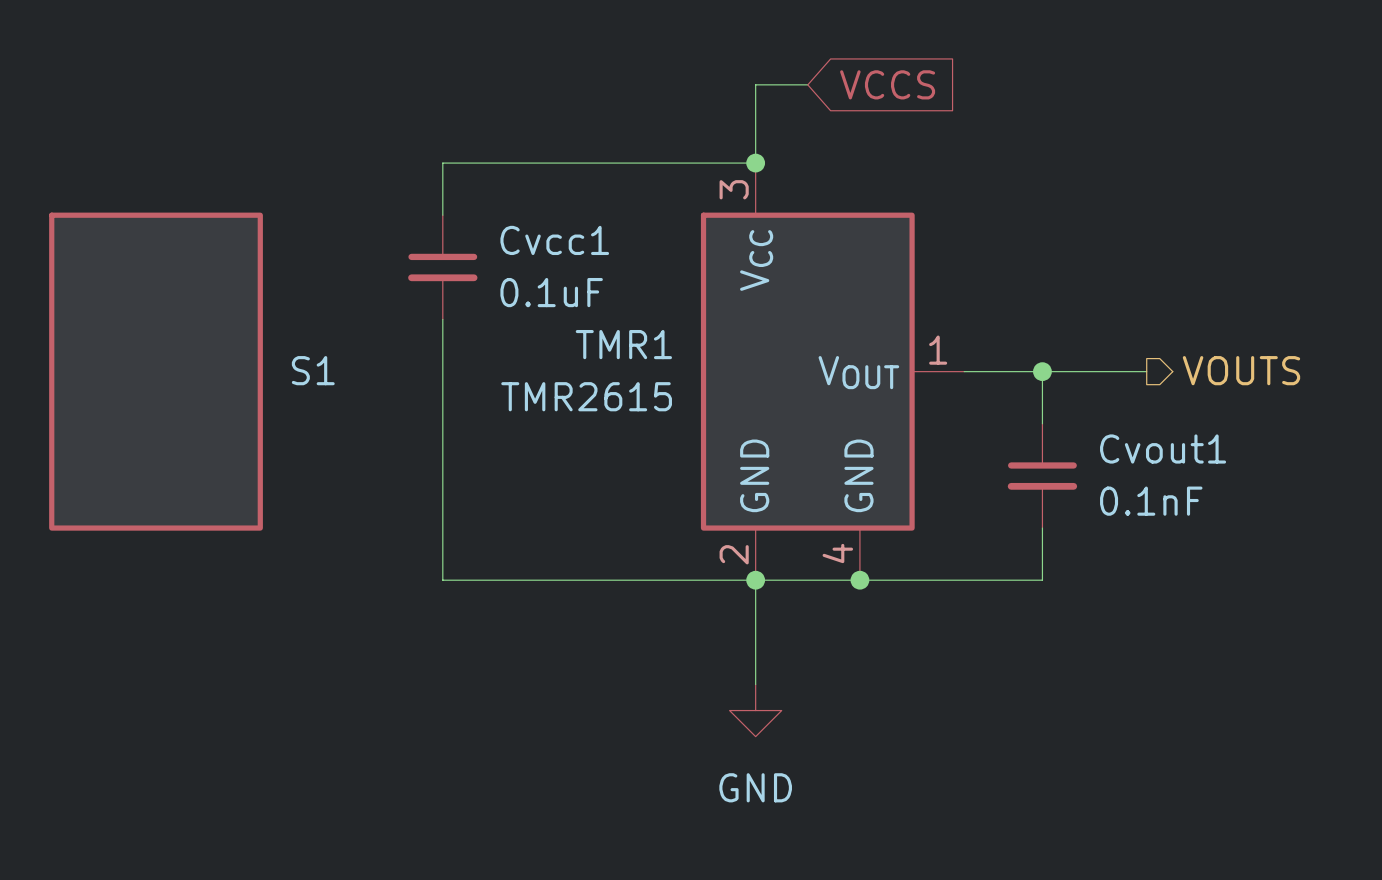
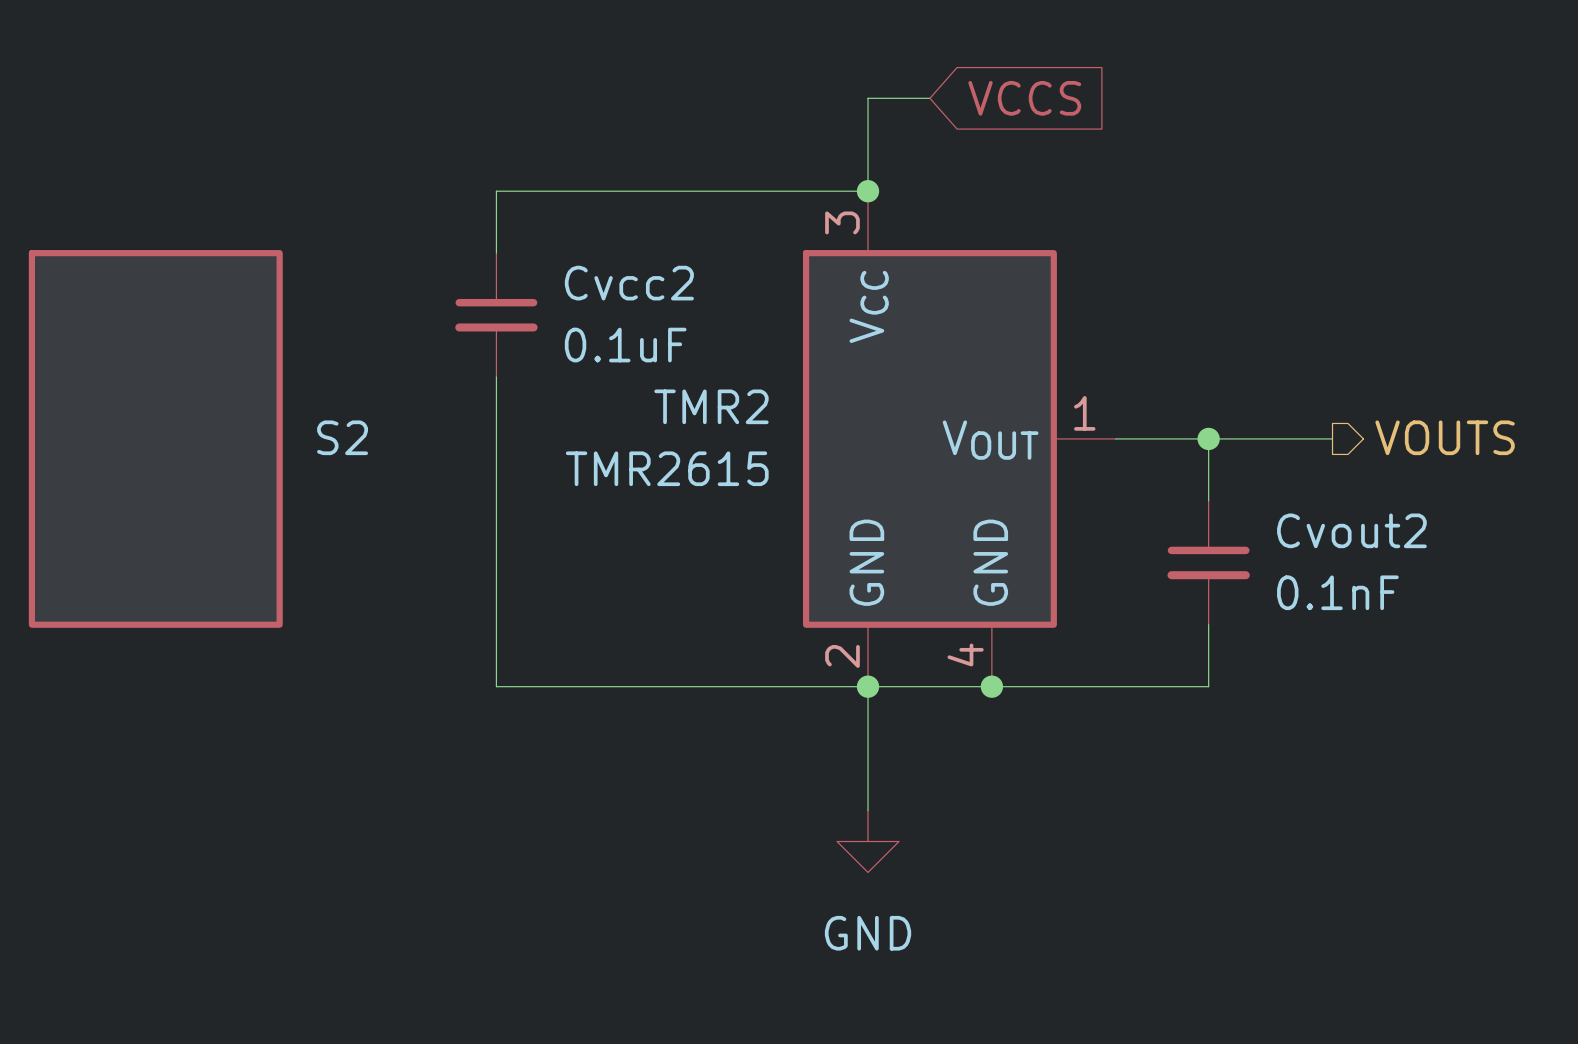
Cvcc1 name: Cvcc1 (554, 240) -> Cvcc2 (629, 283)
TMR1 name: TMR1 (623, 344) -> TMR2 (711, 406)
S1 name: S1 (313, 370) -> S2 (342, 437)
Cvout1 name: Cvout1 (1163, 449) -> Cvout2 (1351, 530)

